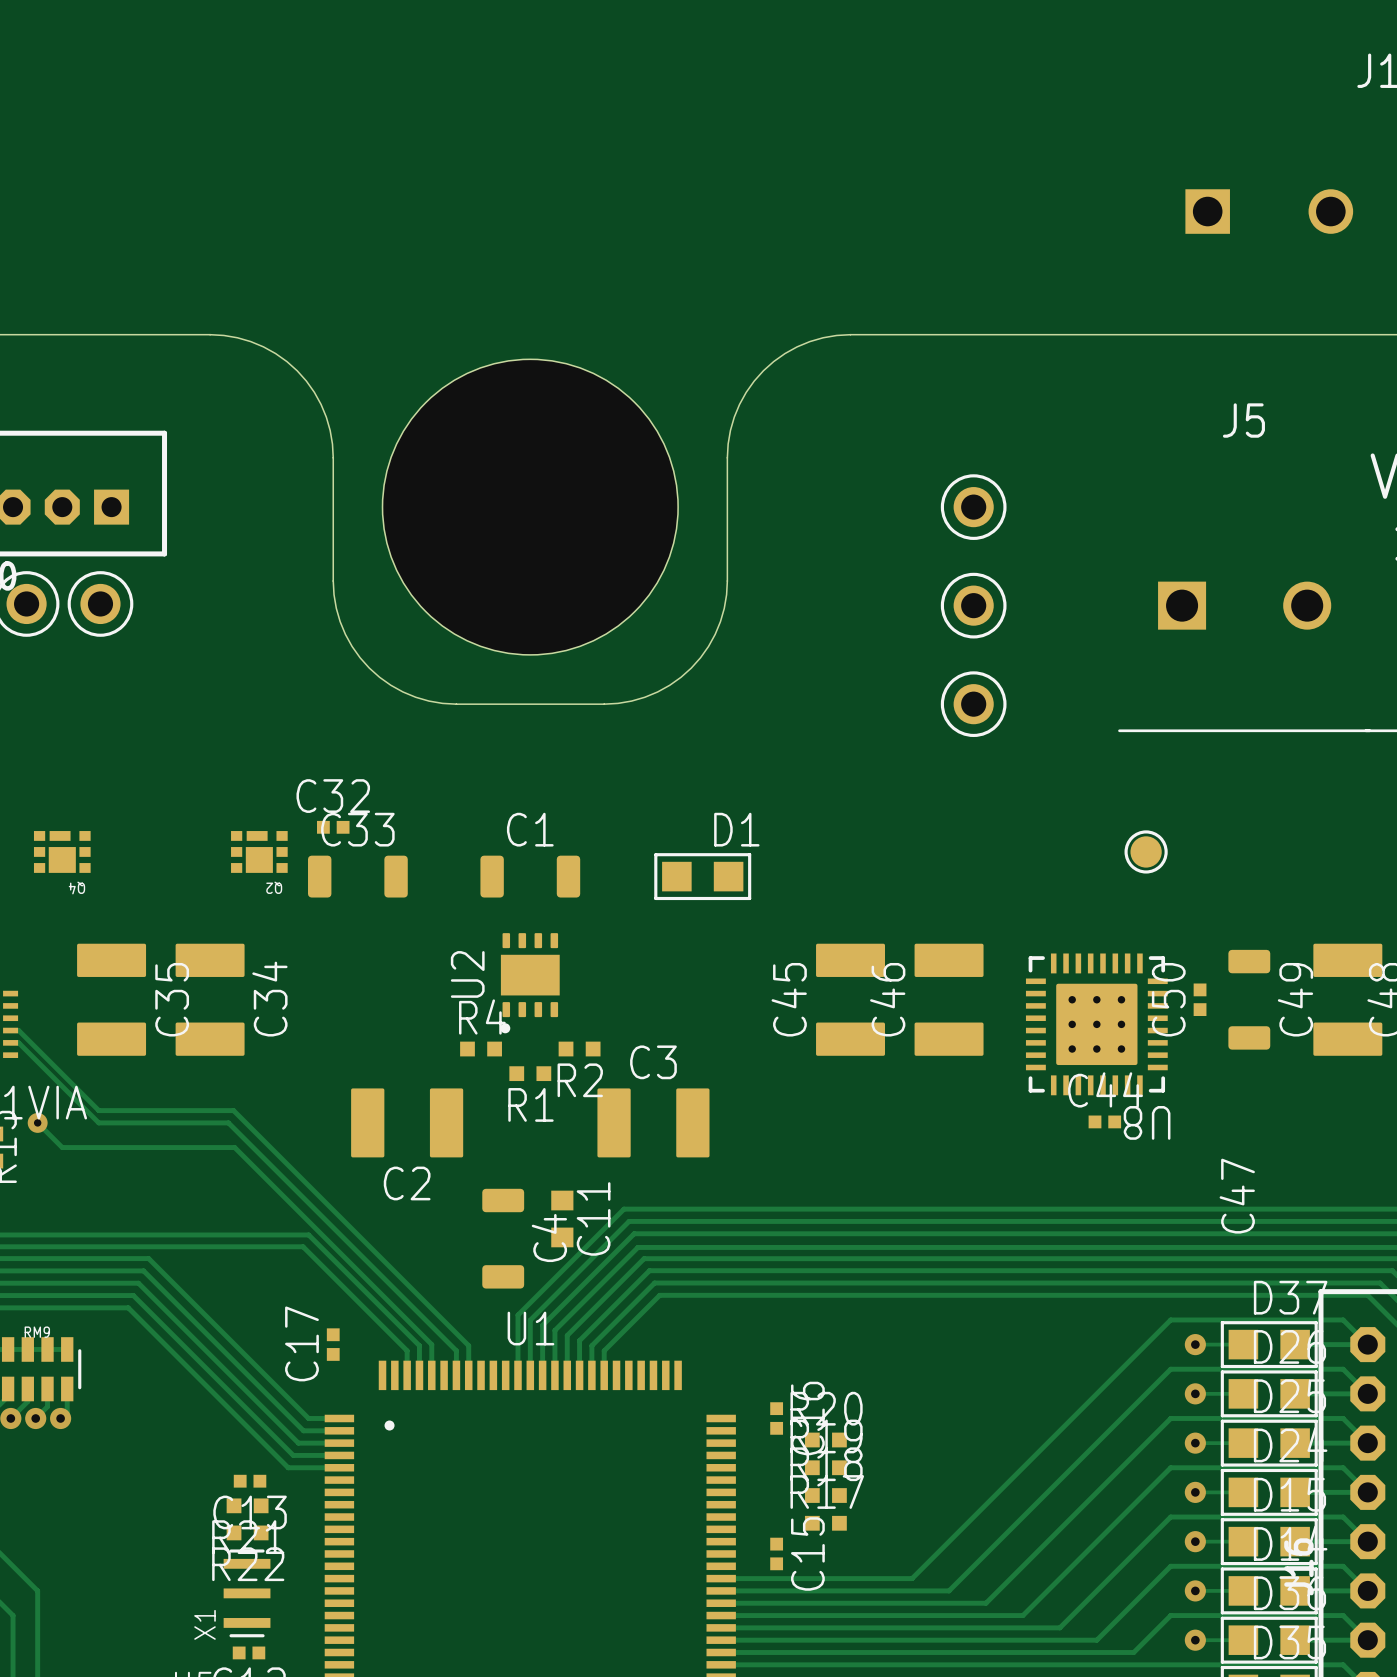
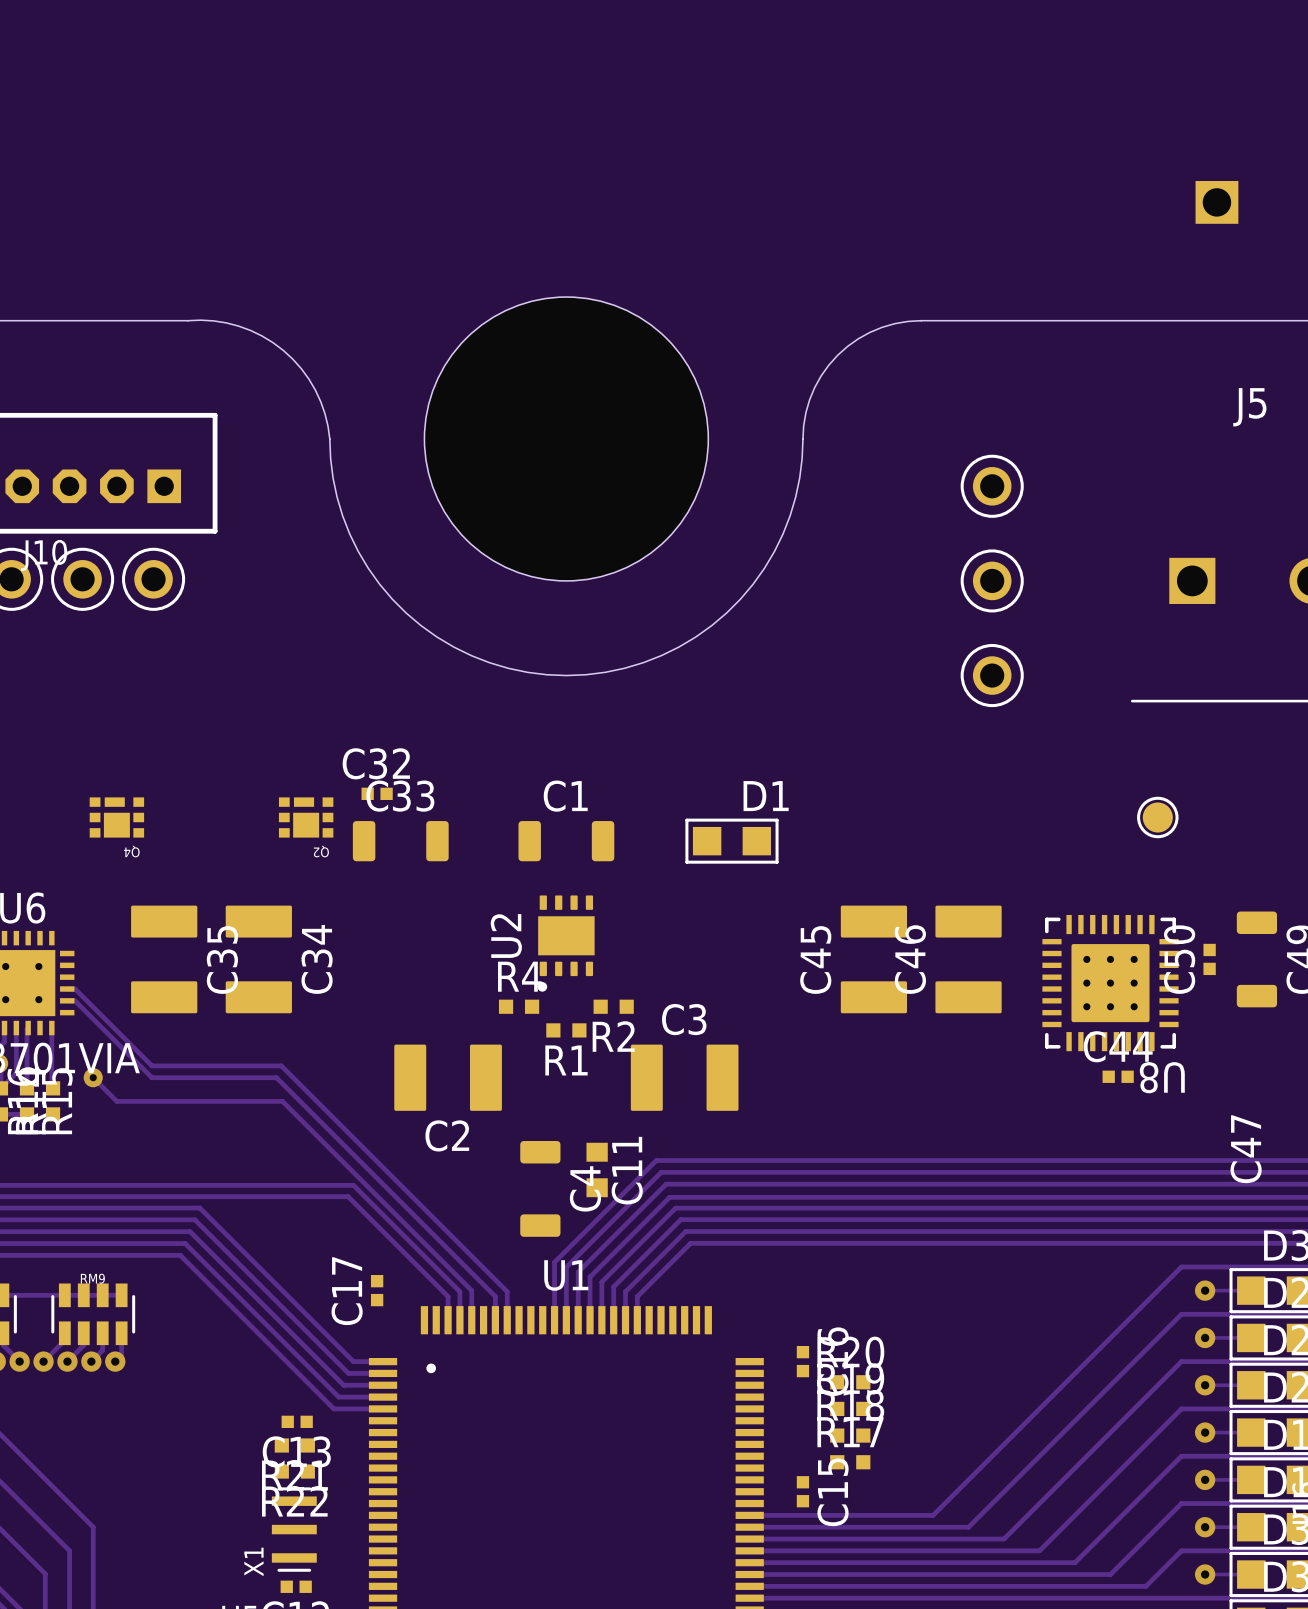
board edge: (136, 334) (210, 334) (237, 337) (250, 341) (275, 353) (286, 361) (306, 381) (314, 392) (326, 417) (332, 444) (334, 594) (340, 621) (345, 634) (360, 657) (379, 677) (390, 685) (415, 697) (442, 703) (456, 704) (617, 703) (644, 697) (669, 685) (680, 677) (700, 657) (708, 646) (720, 621) (724, 608) (727, 581) (728, 444) (734, 417) (746, 392) (754, 381) (773, 361) (784, 353) (809, 341) (836, 335) (899, 334) -> (187, 320) (213, 320) (250, 330) (273, 342) (301, 368) (315, 390) (325, 413) (329, 438) (333, 477) (342, 515) (349, 534) (368, 568) (392, 599) (406, 613) (436, 637) (471, 655) (489, 662) (527, 672) (566, 675) (605, 672) (643, 662) (661, 655) (695, 637) (726, 613) (740, 599) (764, 568) (783, 534) (790, 515) (799, 477) (805, 412) (821, 376) (837, 355) (858, 338) (882, 327) (921, 320)
hole position: (530, 507) -> (566, 438)

